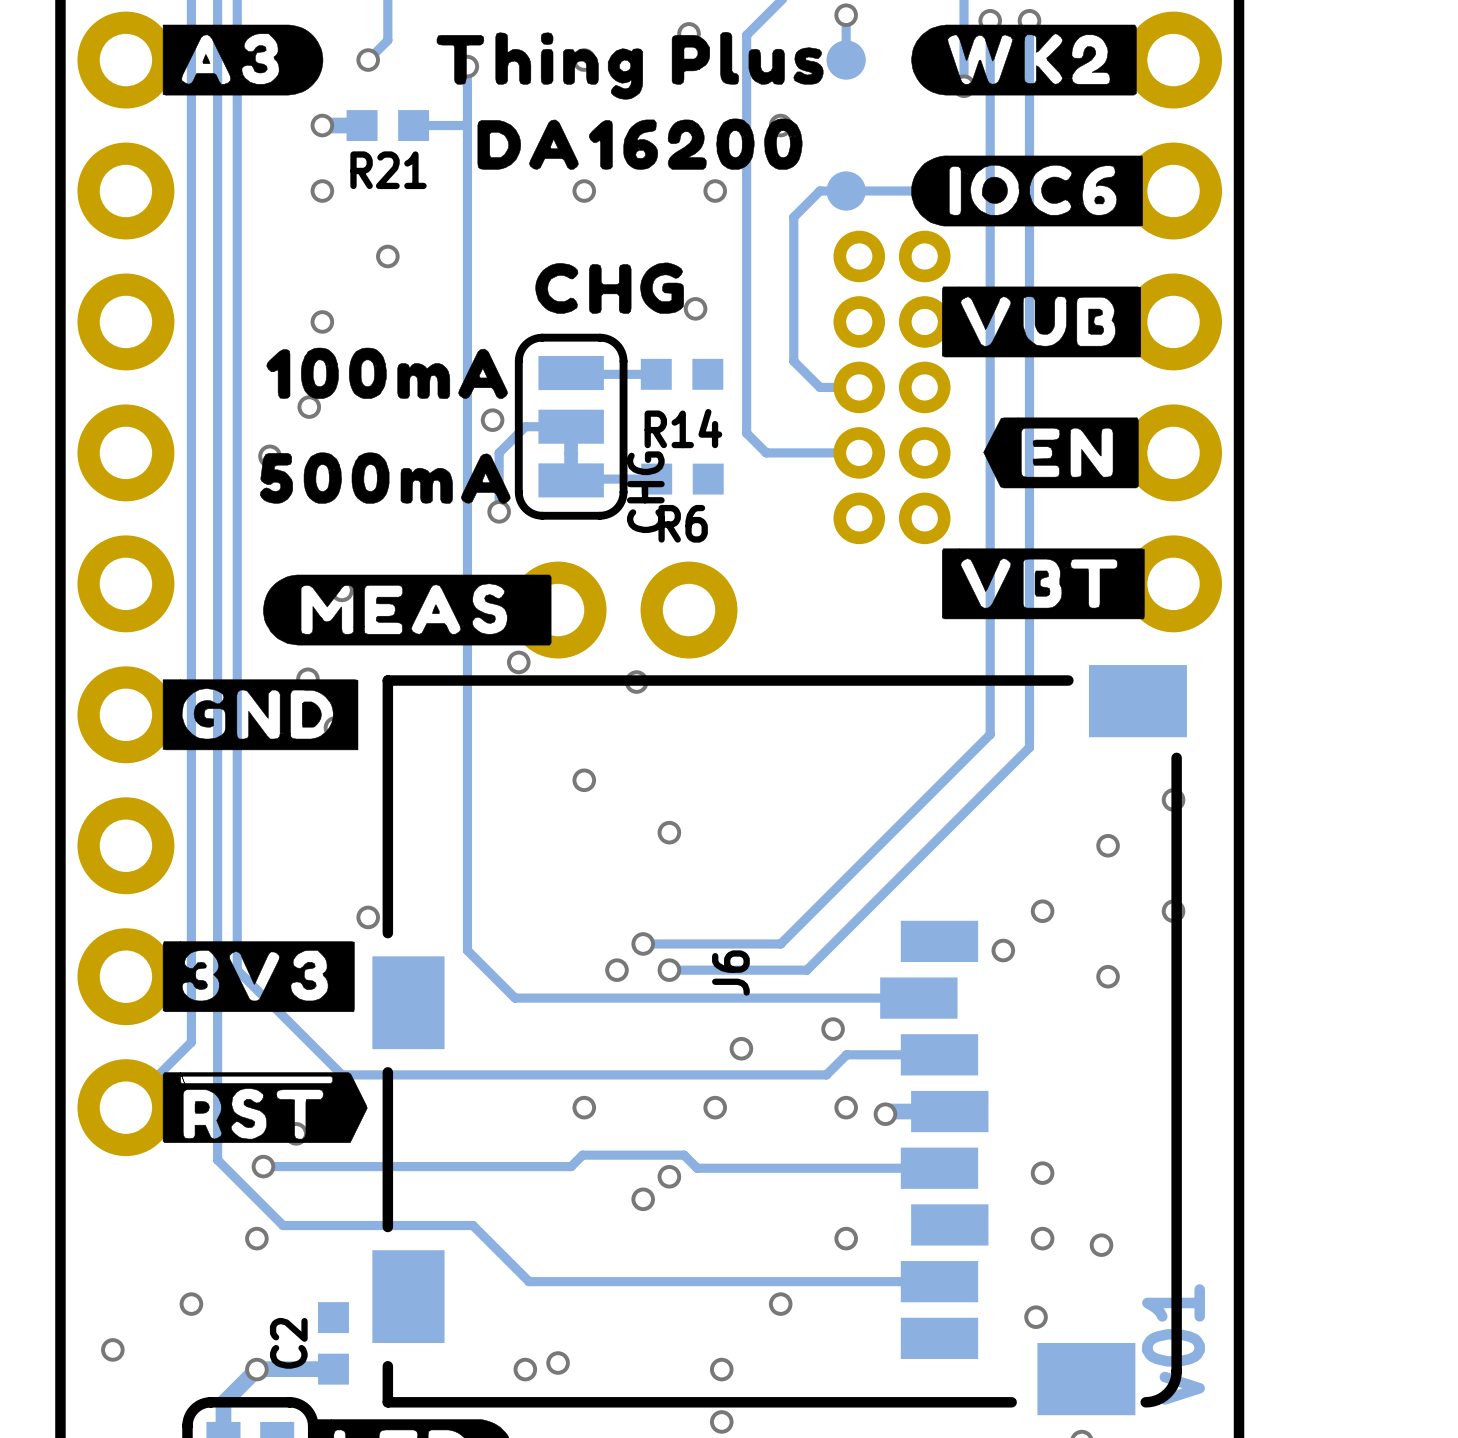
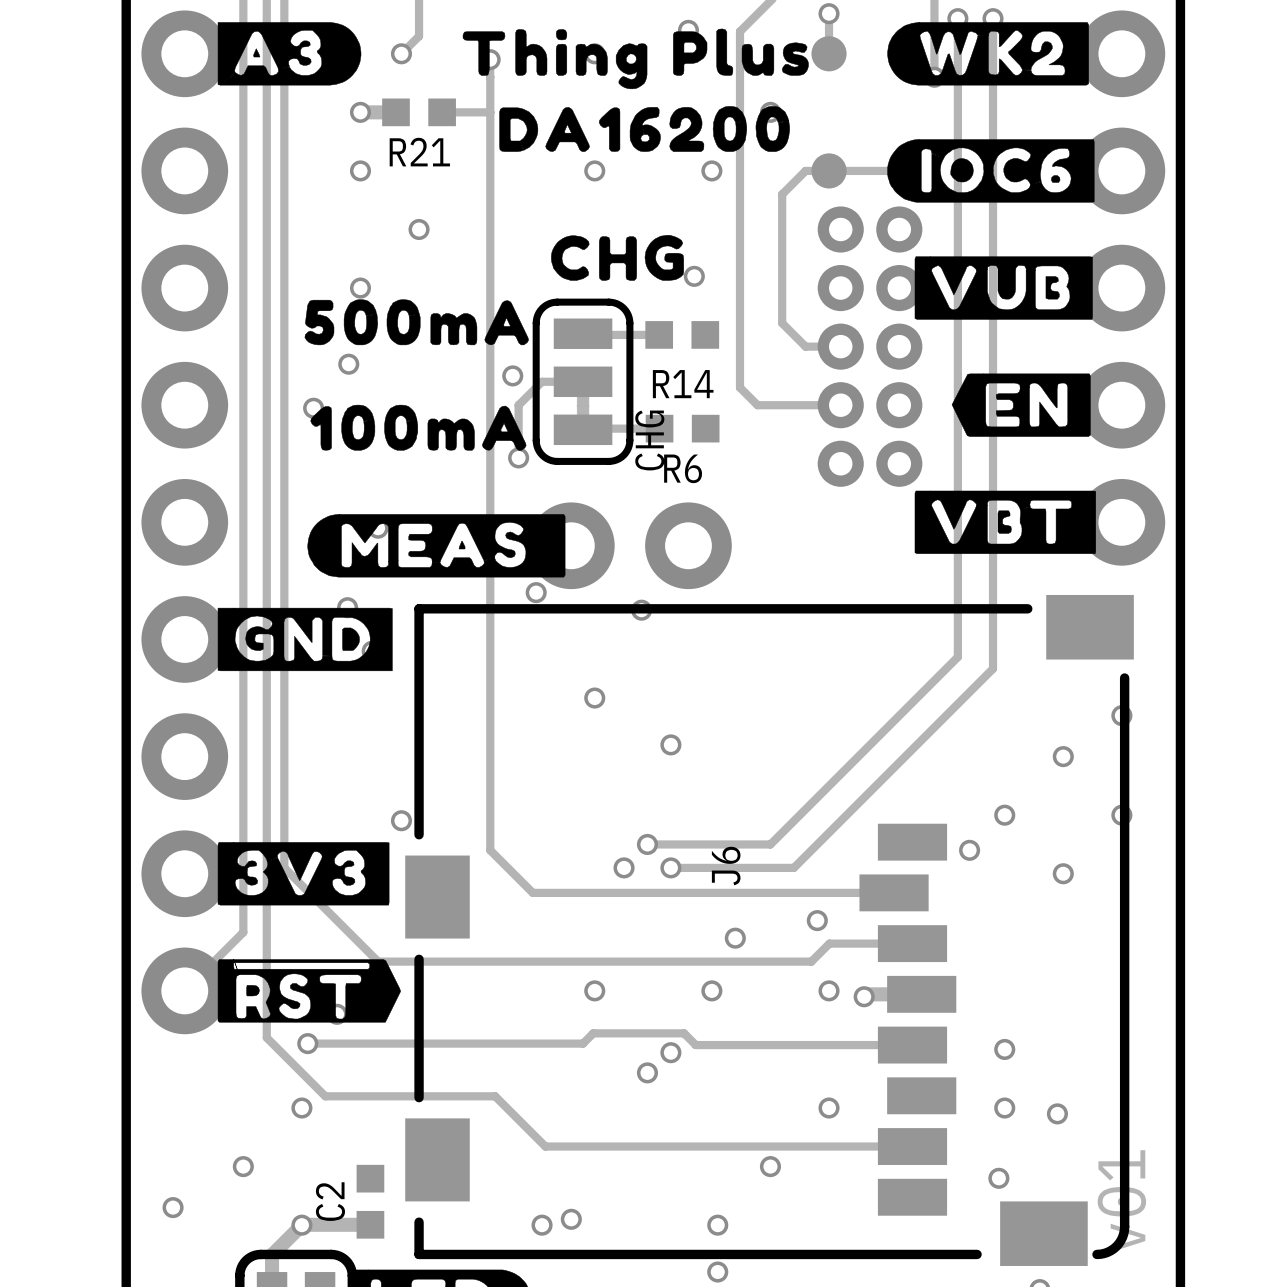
drawing position: (387, 373) -> (418, 427)
drawing position: (385, 478) -> (416, 322)

